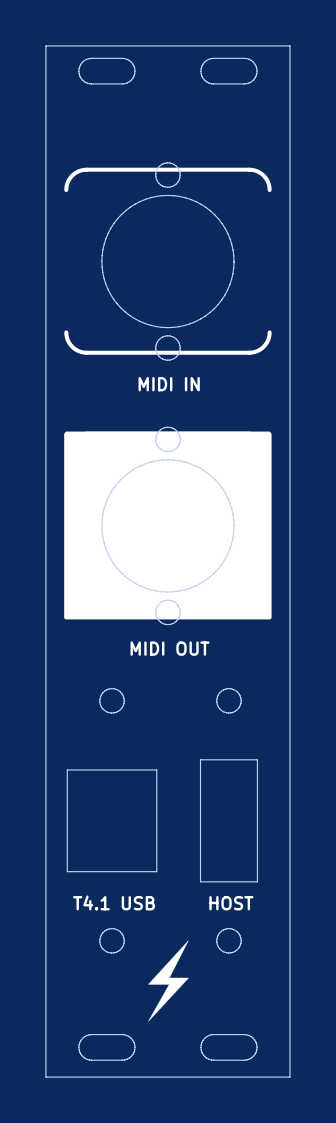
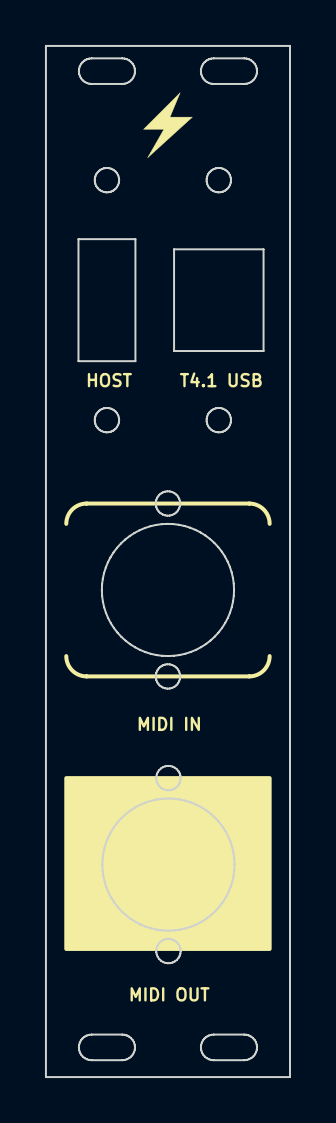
drawing: none -> [143, 92, 193, 158]
board edge: (167, 162) (160, 165) (155, 173) (158, 183) (167, 187) (176, 183) (180, 175) (176, 166) (167, 162) -> (218, 167) (209, 172) (206, 181) (211, 189) (218, 192) (227, 189) (231, 180) (227, 171) (218, 167)
board edge: none -> (106, 167) (115, 171) (119, 180) (115, 189) (106, 192) (99, 189) (94, 181) (97, 172) (106, 167)
line: (66, 190) (67, 182) (72, 175) (78, 171) (86, 169) (251, 169) (259, 172) (265, 177) (269, 190) -> none
board edge: (168, 195) (145, 199) (130, 207) (121, 214) (110, 228) (105, 238) (101, 261) (102, 272) (107, 289) (120, 307) (134, 318) (144, 323) (167, 327) (195, 321) (214, 308) (224, 295) (229, 284) (234, 261) (227, 233) (214, 214) (195, 201) (179, 196) (168, 195) -> none
board edge: none -> (78, 239) (135, 239) (135, 361) (78, 361) (78, 239)
board edge: none -> (174, 249) (174, 351) (263, 351) (263, 249) (174, 249)
line: (66, 332) (67, 340) (72, 346) (78, 351) (86, 352) (251, 352) (259, 350) (265, 344) (269, 332) -> none
board edge: (167, 335) (160, 338) (155, 346) (158, 355) (167, 360) (176, 356) (180, 347) (176, 339) (167, 335) -> (218, 407) (209, 412) (206, 421) (211, 429) (218, 432) (227, 429) (231, 420) (227, 411) (218, 407)
text: none -> T4.1 USB (220, 379)
text: none -> HOST (109, 380)
text: MIDI IN (169, 384) -> none
board edge: none -> (106, 407) (115, 411) (119, 420) (115, 429) (106, 432) (99, 429) (94, 421) (97, 412) (106, 407)
board edge: (167, 427) (176, 430) (180, 439) (176, 448) (167, 451) (158, 447) (155, 438) (160, 429) (167, 427) -> (167, 491) (176, 494) (180, 503) (176, 512) (167, 515) (160, 513) (155, 504) (158, 495) (167, 491)
drawing: [64, 432, 272, 620] -> none
board edge: (168, 459) (179, 460) (195, 466) (214, 479) (227, 498) (234, 525) (229, 549) (224, 559) (214, 573) (195, 586) (167, 592) (144, 587) (134, 582) (120, 572) (107, 553) (102, 537) (101, 525) (105, 503) (110, 492) (121, 479) (130, 471) (145, 463) (168, 459) -> (167, 523) (195, 529) (214, 542) (224, 556) (229, 566) (234, 589) (227, 617) (214, 636) (195, 649) (179, 655) (168, 656) (145, 652) (130, 644) (121, 636) (110, 623) (105, 612) (101, 590) (102, 578) (107, 562) (120, 543) (134, 532) (144, 528) (167, 523)
line: none -> (66, 523) (67, 517) (72, 509) (77, 505) (86, 503) (251, 503) (263, 509) (268, 516) (269, 523)
board edge: (167, 600) (160, 602) (155, 611) (158, 620) (167, 624) (176, 621) (180, 612) (176, 603) (167, 600) -> (167, 664) (158, 668) (155, 677) (160, 686) (167, 688) (176, 685) (180, 676) (176, 667) (167, 664)
text: MIDI OUT (170, 648) -> none
line: none -> (66, 656) (67, 662) (72, 670) (77, 674) (86, 676) (251, 676) (259, 673) (265, 668) (269, 656)
board edge: (111, 688) (120, 691) (124, 700) (120, 709) (111, 713) (102, 708) (99, 699) (104, 691) (111, 688) -> (167, 765) (176, 769) (180, 778) (176, 786) (167, 790) (160, 787) (156, 779) (159, 770) (167, 765)
board edge: (228, 688) (221, 691) (216, 699) (219, 708) (228, 713) (237, 709) (241, 700) (237, 691) (228, 688) -> none
text: none -> MIDI IN (169, 723)
board edge: (200, 759) (200, 881) (257, 881) (257, 759) (200, 759) -> none
board edge: (67, 769) (67, 871) (156, 871) (156, 769) (67, 769) -> none
drawing: none -> [64, 776, 272, 951]
board edge: none -> (167, 798) (195, 804) (214, 817) (225, 831) (230, 841) (234, 864) (228, 892) (215, 911) (196, 924) (180, 929) (168, 930) (146, 926) (130, 918) (121, 911) (111, 897) (106, 887) (102, 864) (103, 853) (108, 836) (121, 818) (135, 807) (145, 802) (167, 798)
text: T4.1 USB (114, 902) -> none
text: HOST (231, 903) -> none
board edge: (111, 928) (104, 931) (99, 939) (102, 948) (111, 953) (120, 949) (124, 940) (120, 931) (111, 928) -> (167, 938) (159, 943) (156, 952) (160, 960) (167, 963) (176, 959) (180, 951) (176, 942) (167, 938)
board edge: (228, 928) (237, 931) (241, 940) (237, 949) (228, 953) (219, 948) (216, 939) (221, 931) (228, 928) -> none
drawing: [148, 940, 189, 1022] -> none
text: none -> MIDI OUT (170, 994)

